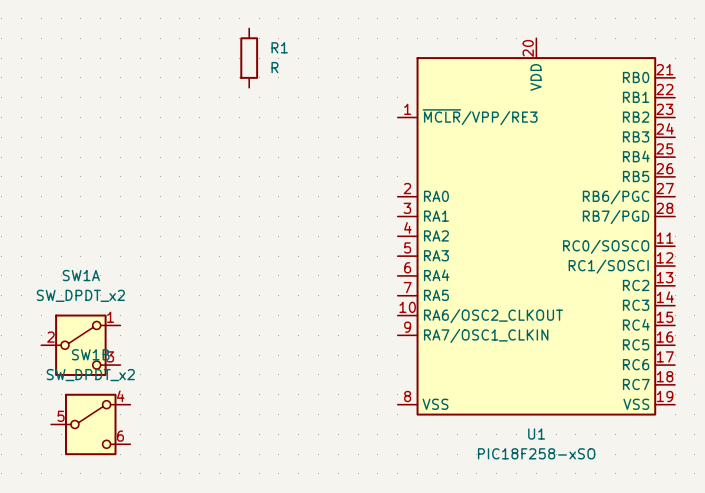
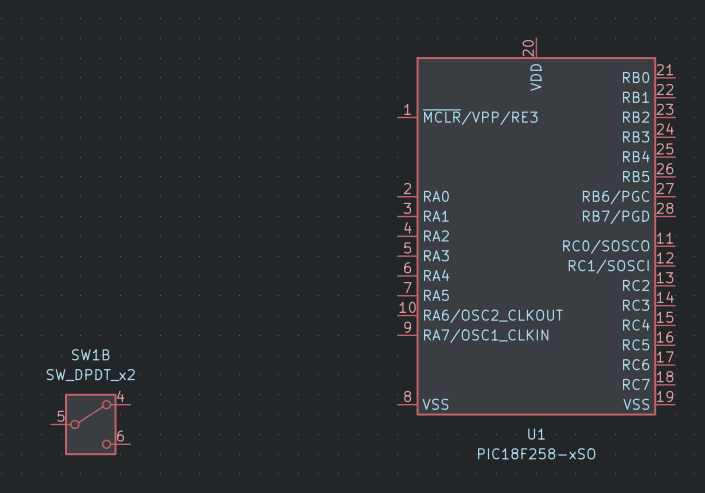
R1: R (249, 58) -> none
SW1A: SW_DPDT_x2 (80, 345) -> none

